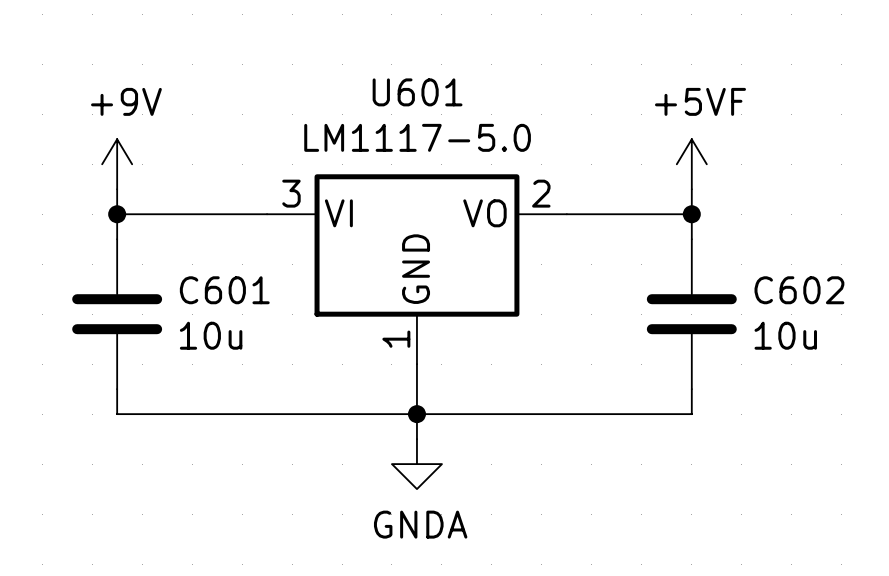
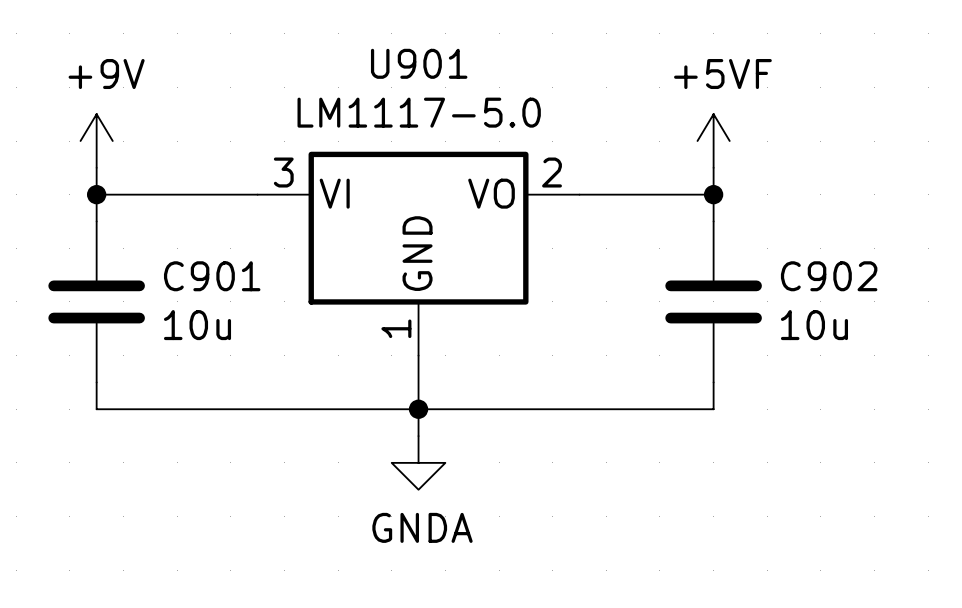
U601 name: U601 (417, 92) -> U901 (419, 63)
C601 name: C601 (224, 290) -> C901 (212, 276)
C602 name: C602 (799, 290) -> C902 (829, 276)

